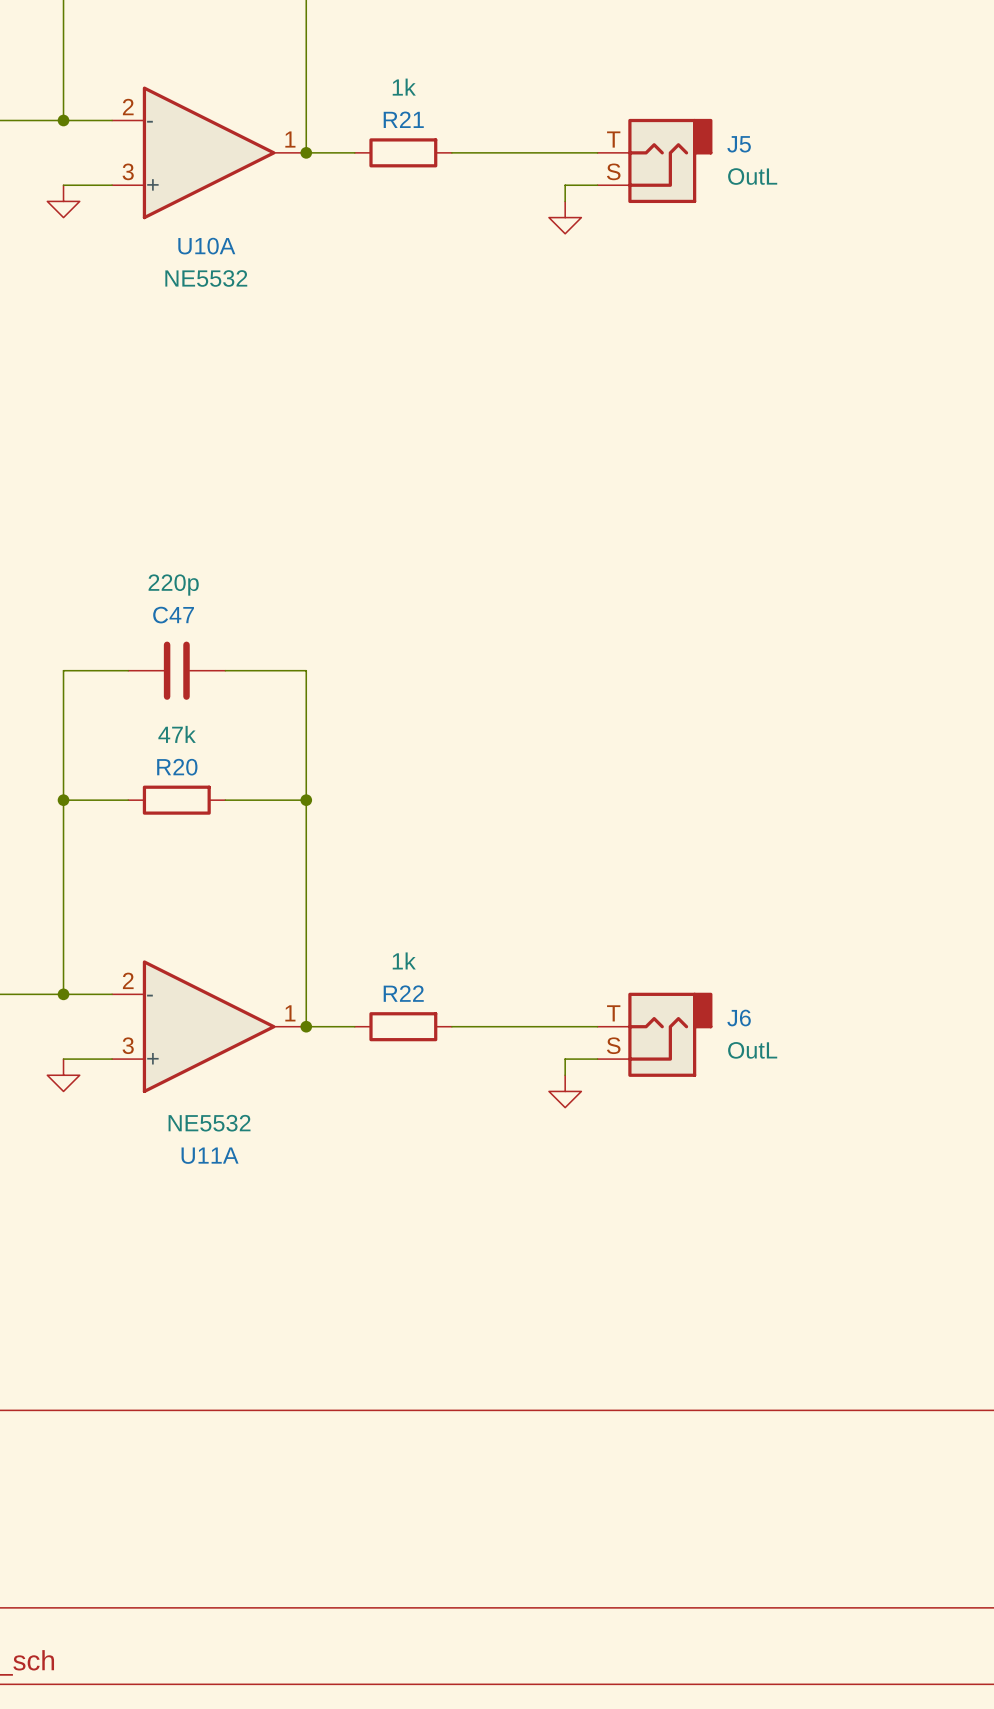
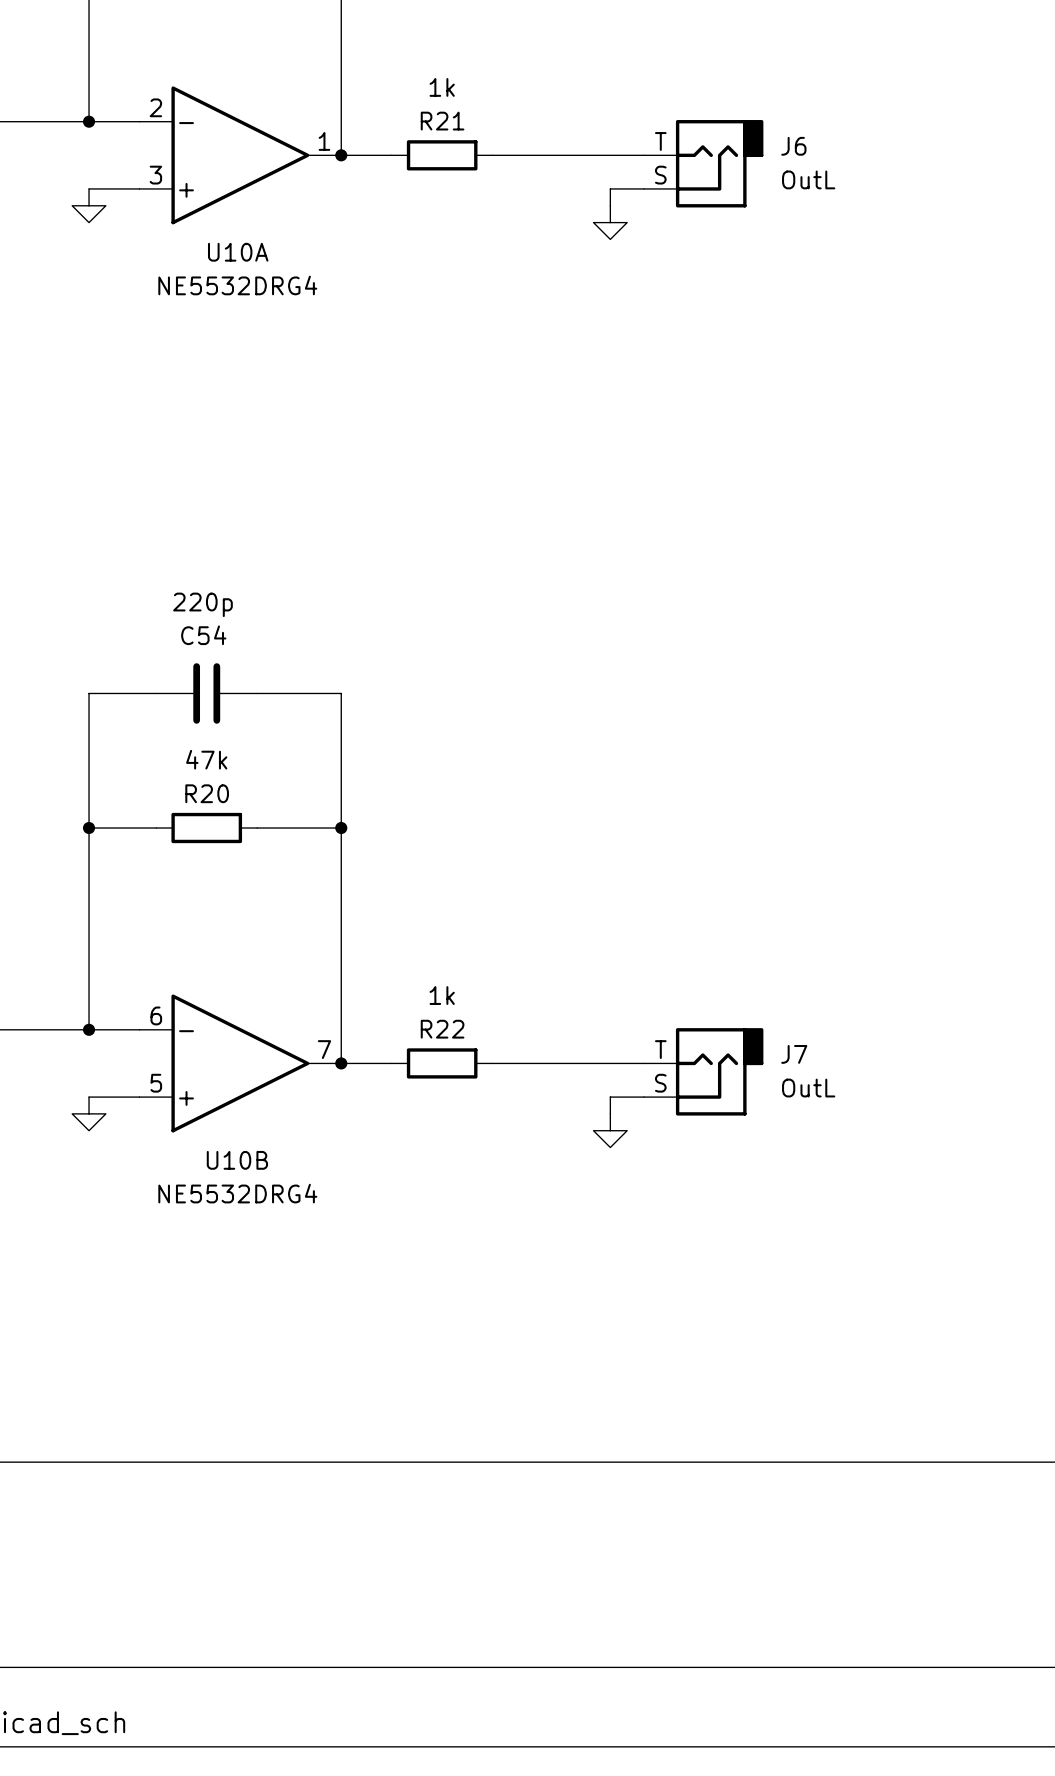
J5 name: J5 (739, 144) -> J6 (793, 146)
U10A value: NE5532 (206, 278) -> NE5532DRG4 (237, 285)
C47 name: C47 (173, 615) -> C54 (203, 635)
U11A pin number: 2 (128, 980) -> 6 (156, 1015)
U11A pin number: 1 (290, 1013) -> 7 (324, 1049)
J6 name: J6 (739, 1018) -> J7 (794, 1054)
U11A pin number: 3 (128, 1045) -> 5 (156, 1083)
U11A value: NE5532 (209, 1123) -> NE5532DRG4 (237, 1193)
U11A name: U11A (210, 1155) -> U10B (237, 1160)

